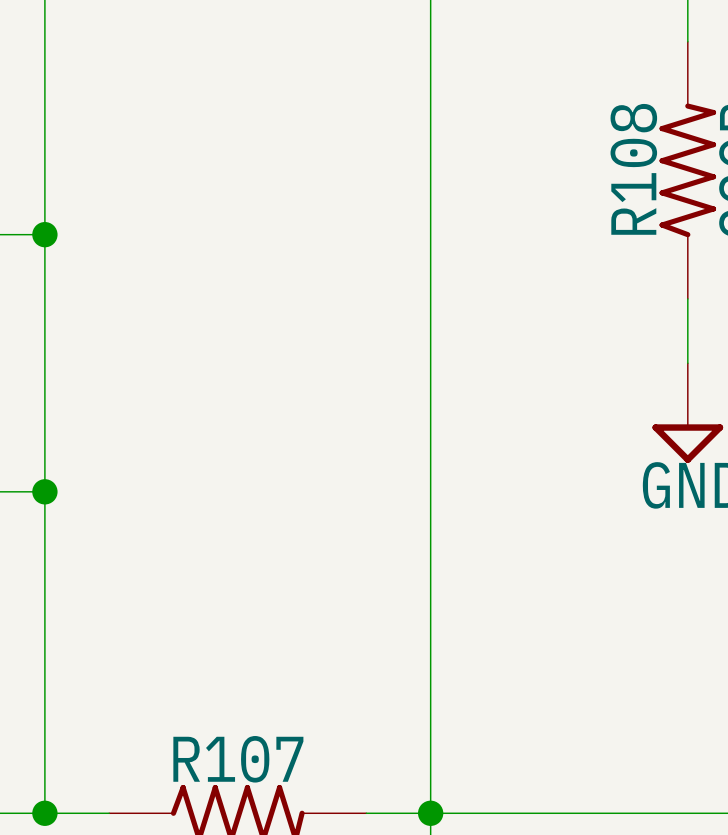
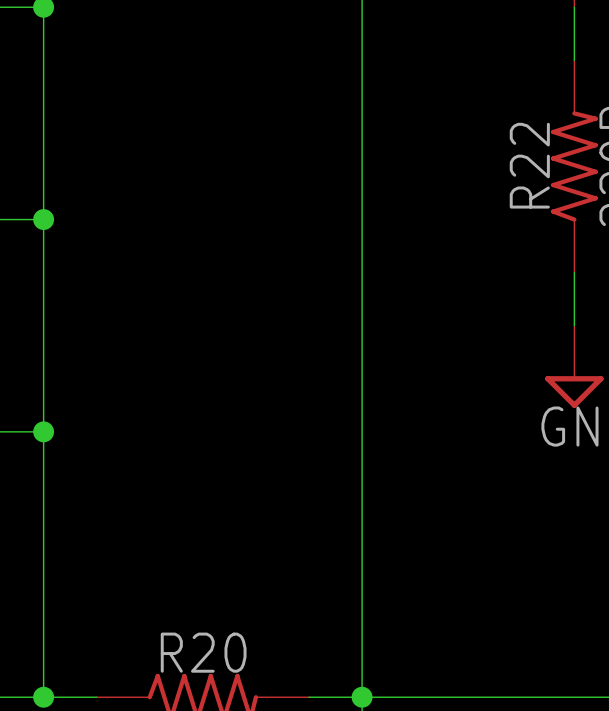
R108 name: R108 (633, 169) -> R22 (529, 165)
R107 name: R107 (238, 759) -> R20 (203, 652)

